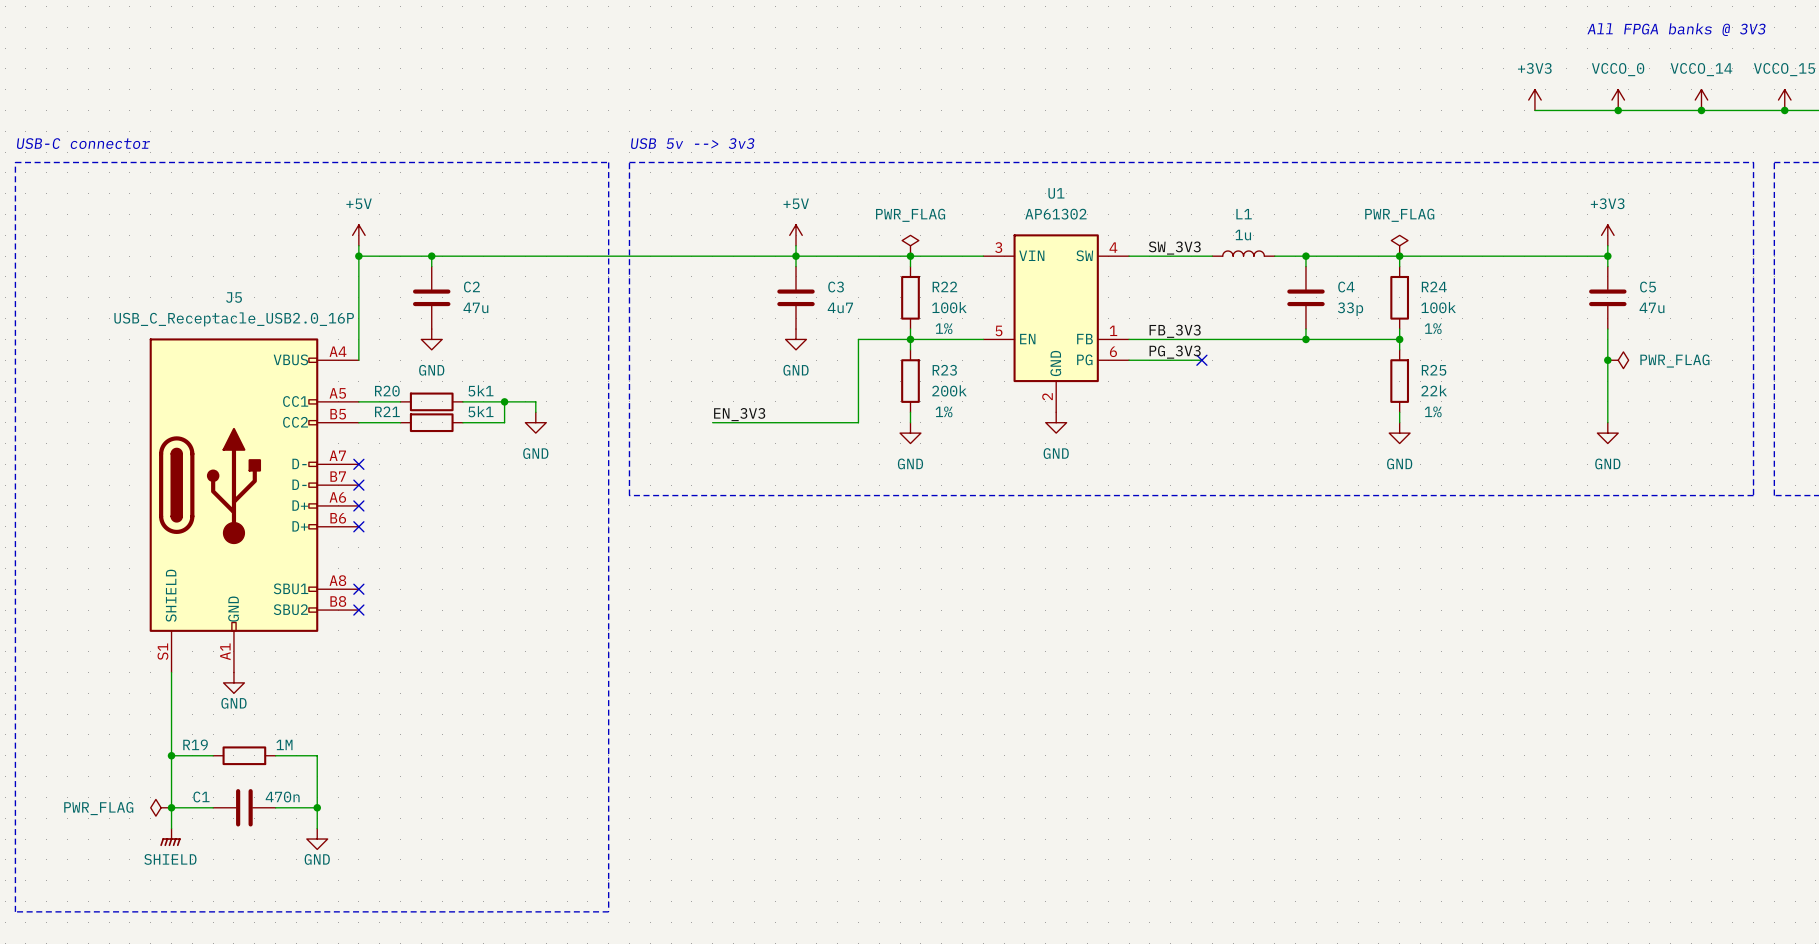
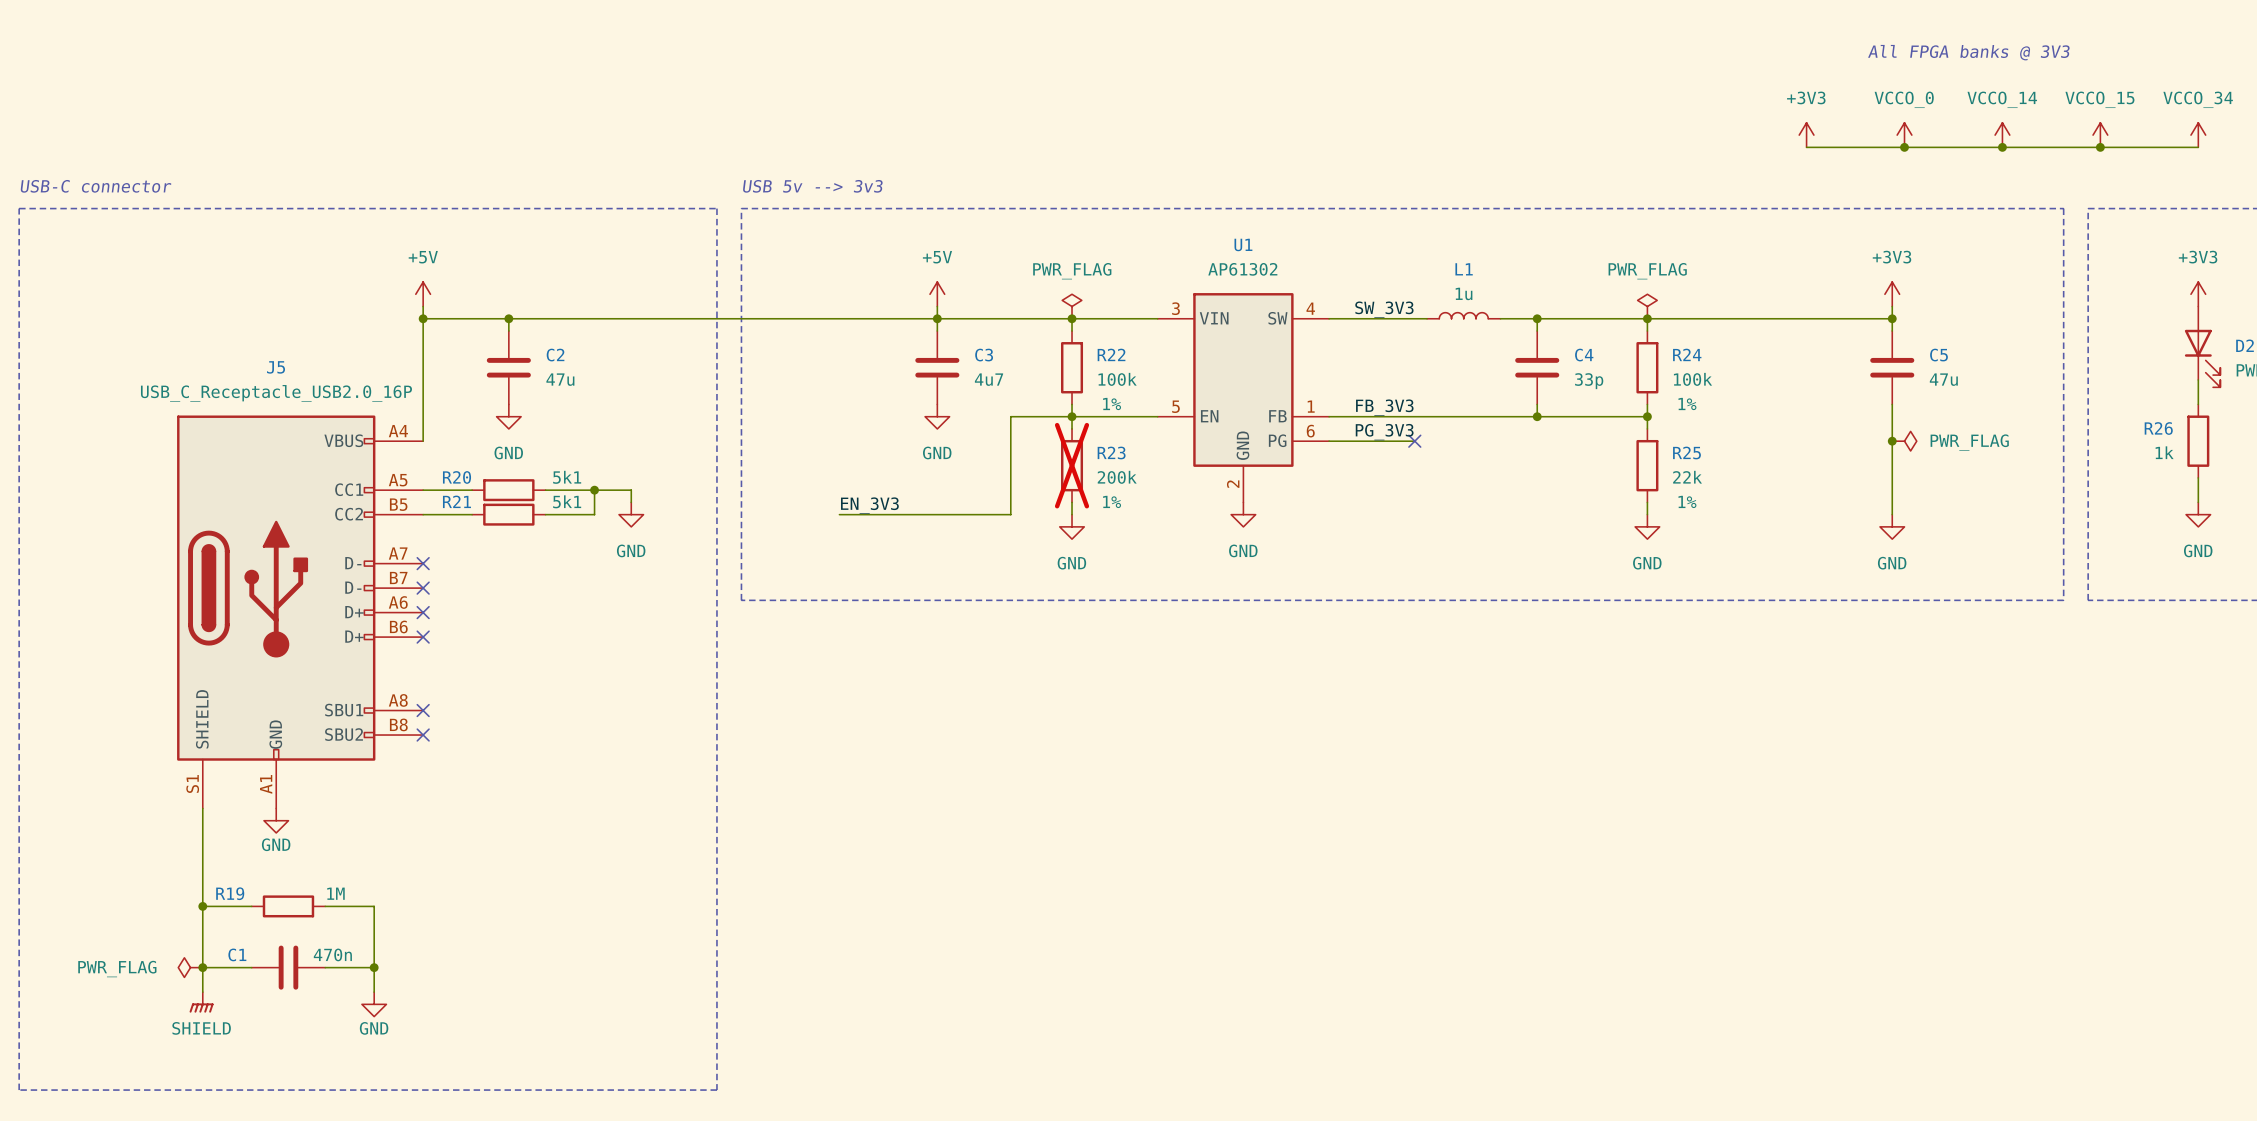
R23 do-not-place cross: none -> (1072, 465)

